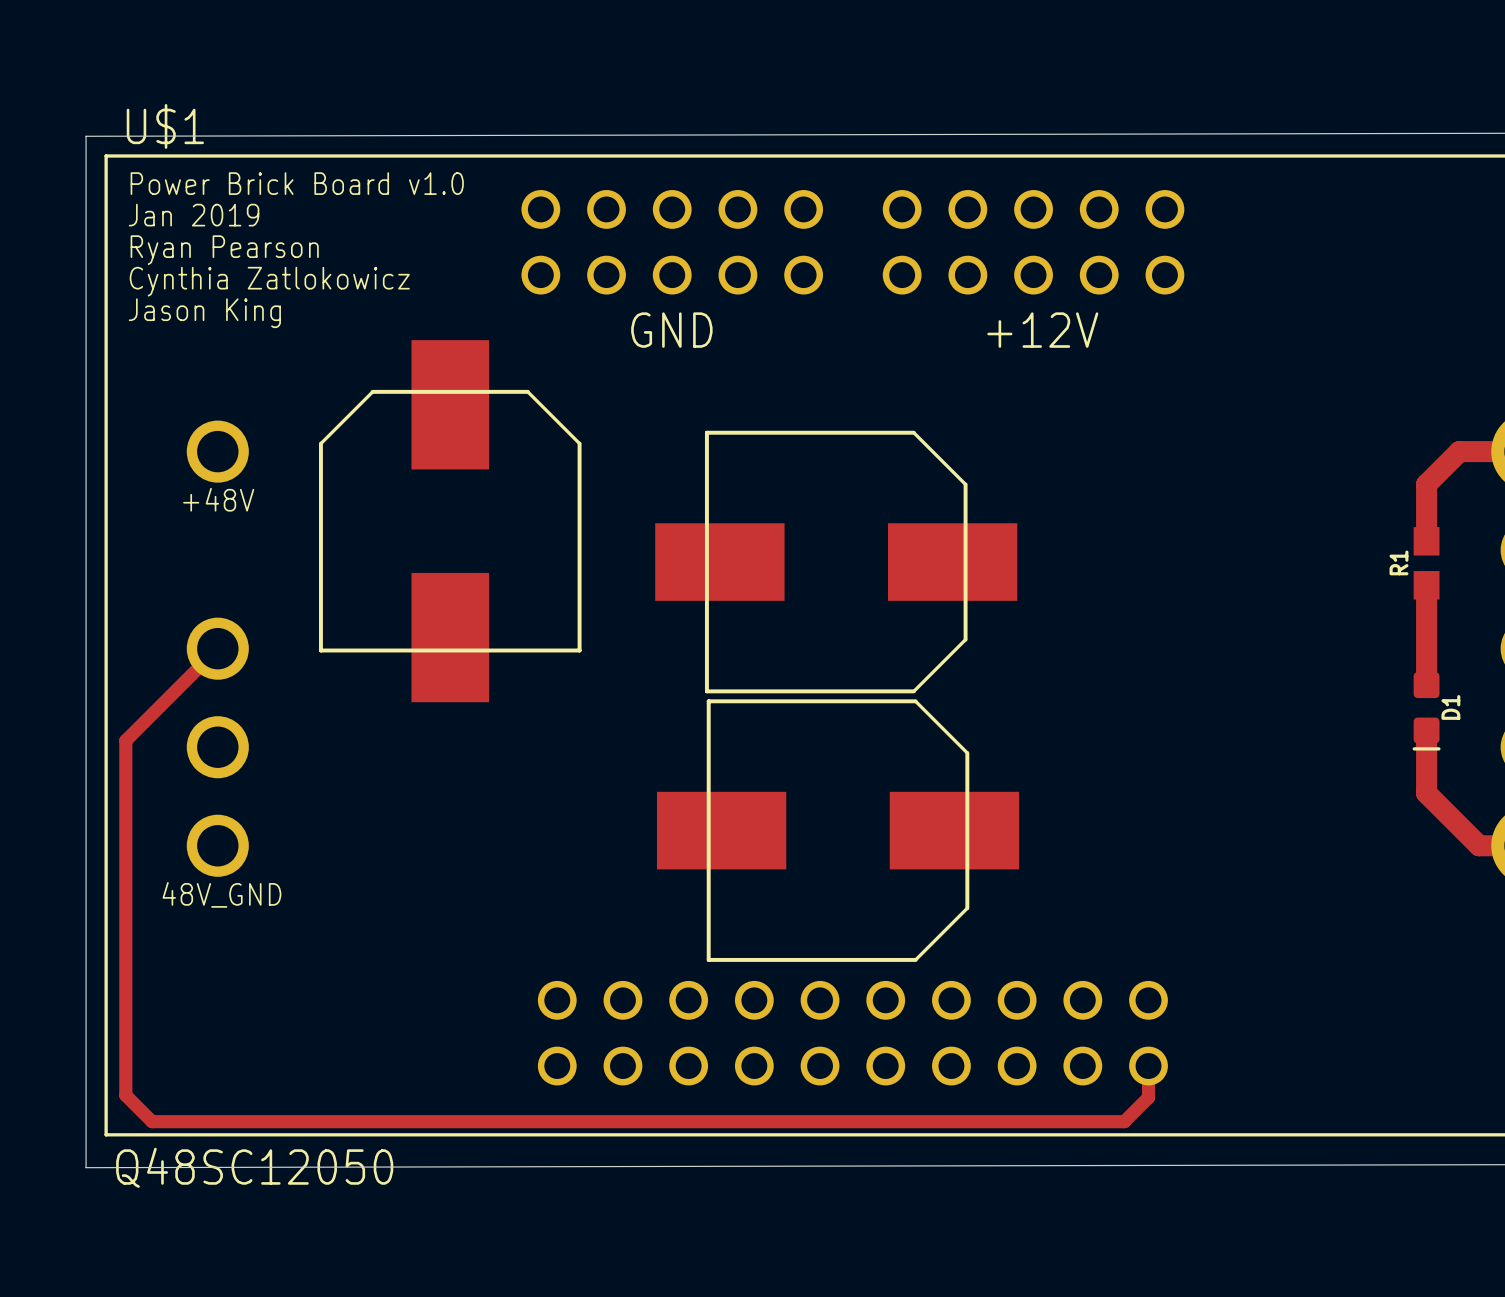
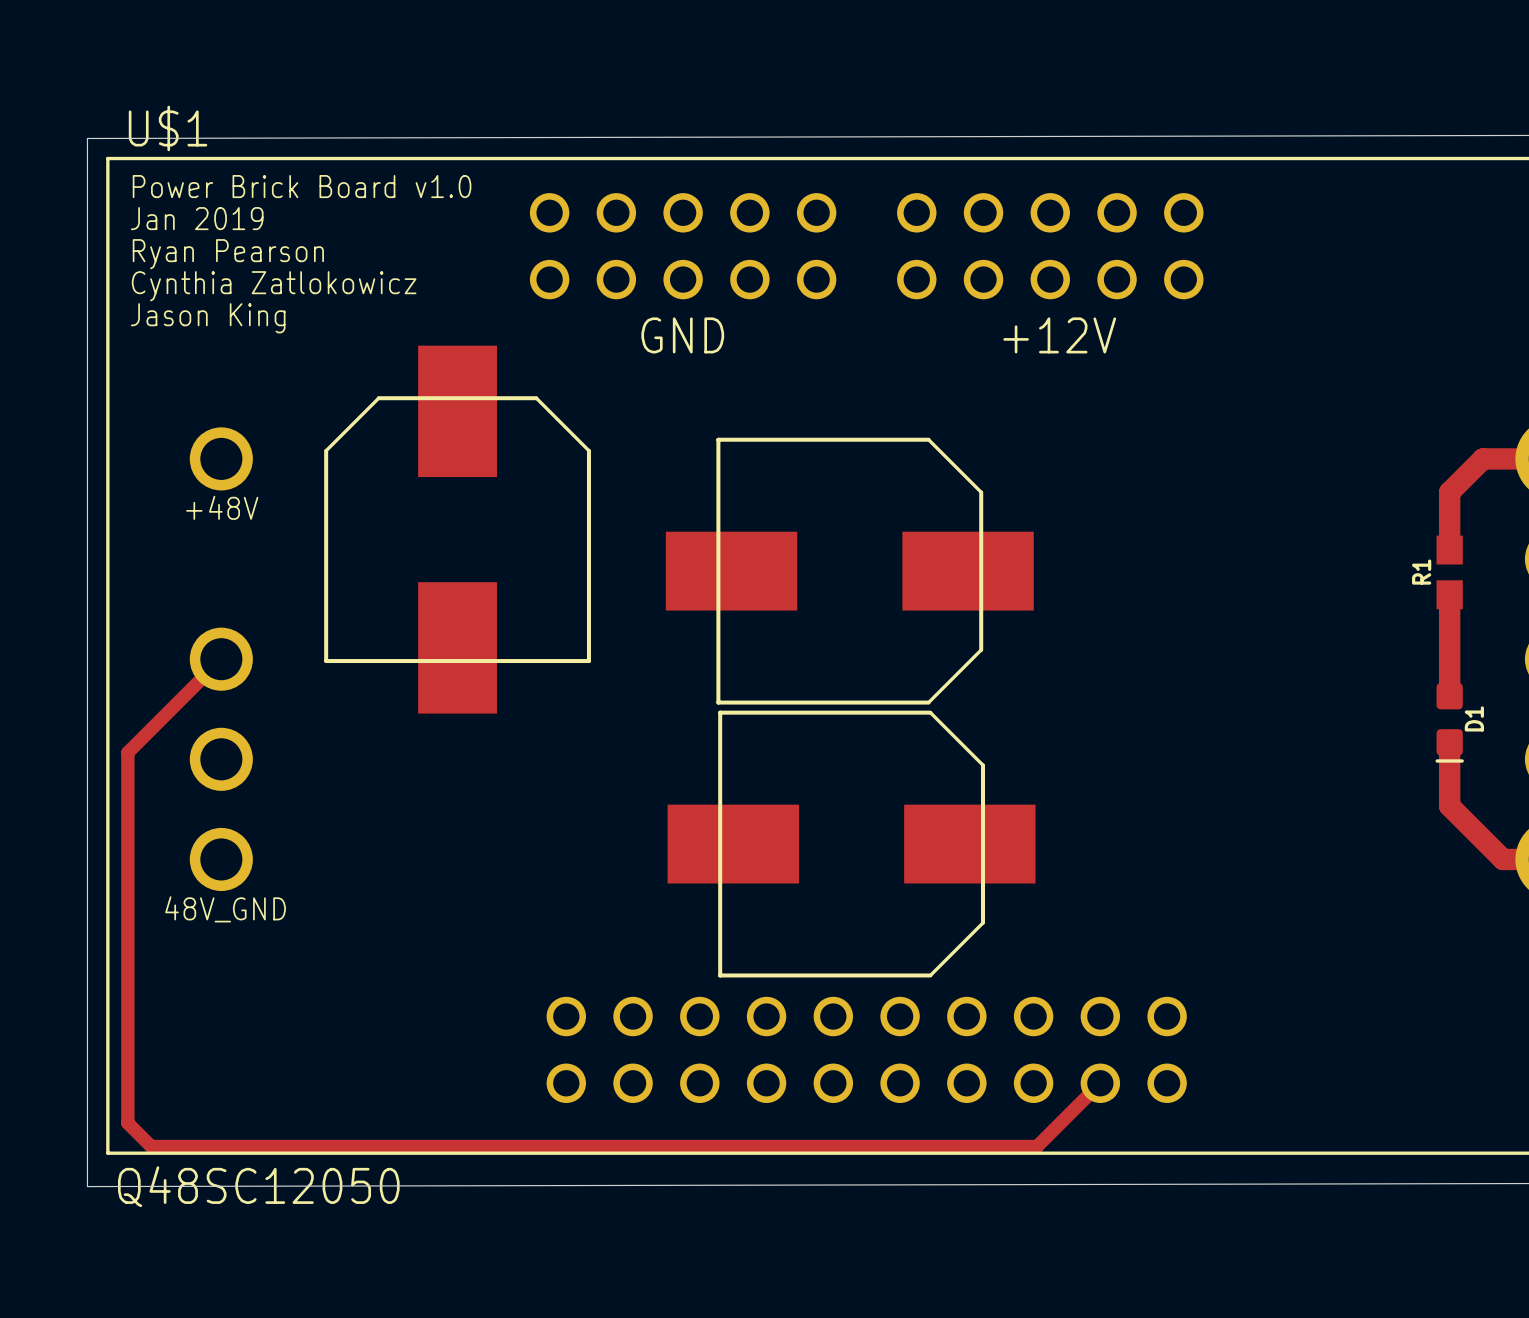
track: (1148, 1066) (1148, 1097) (1124, 1121) (152, 1121) (125, 1095) -> (1100, 1083) (1037, 1146) (151, 1146) (127, 1123) (127, 1113)

